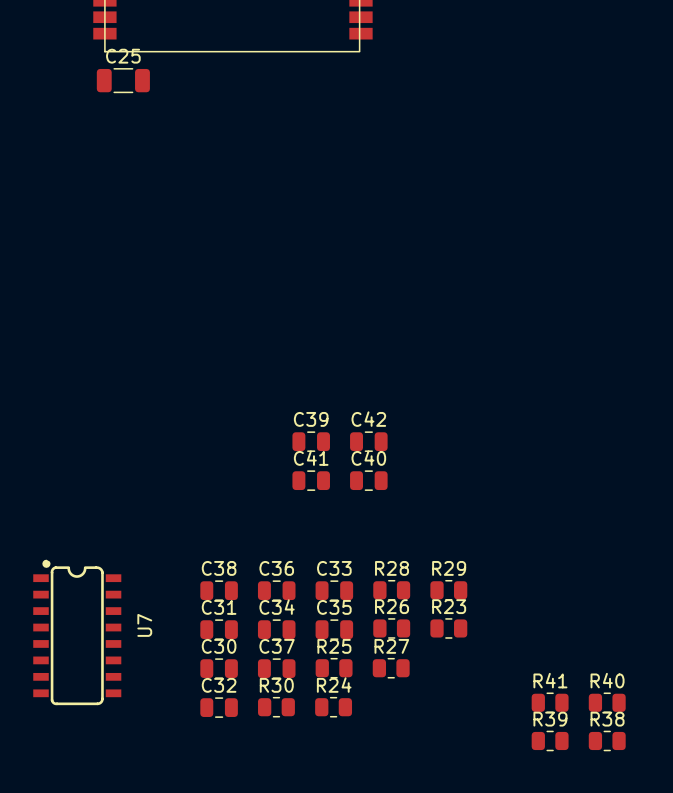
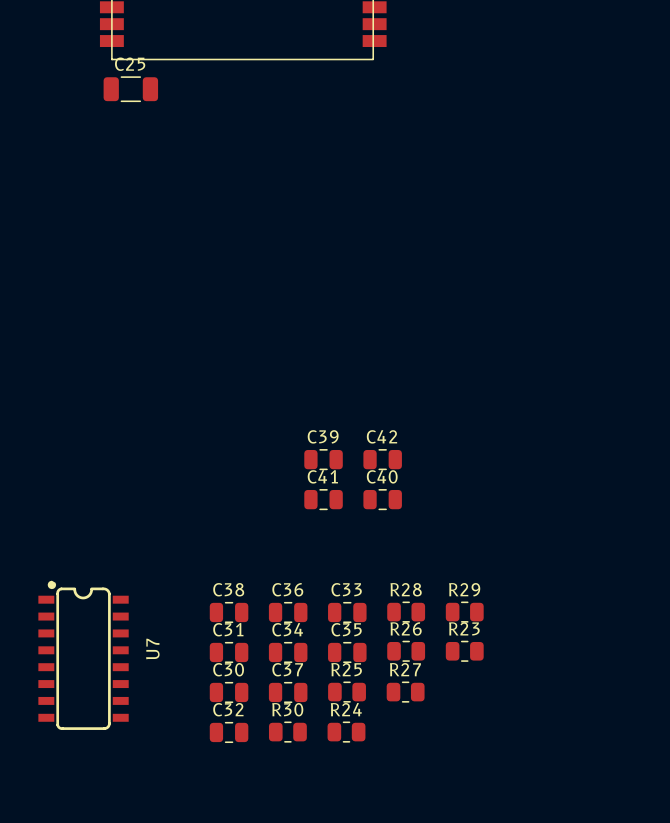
R41: (550, 702) -> none
R40: (607, 702) -> none
R39: (550, 740) -> none
R38: (607, 740) -> none

